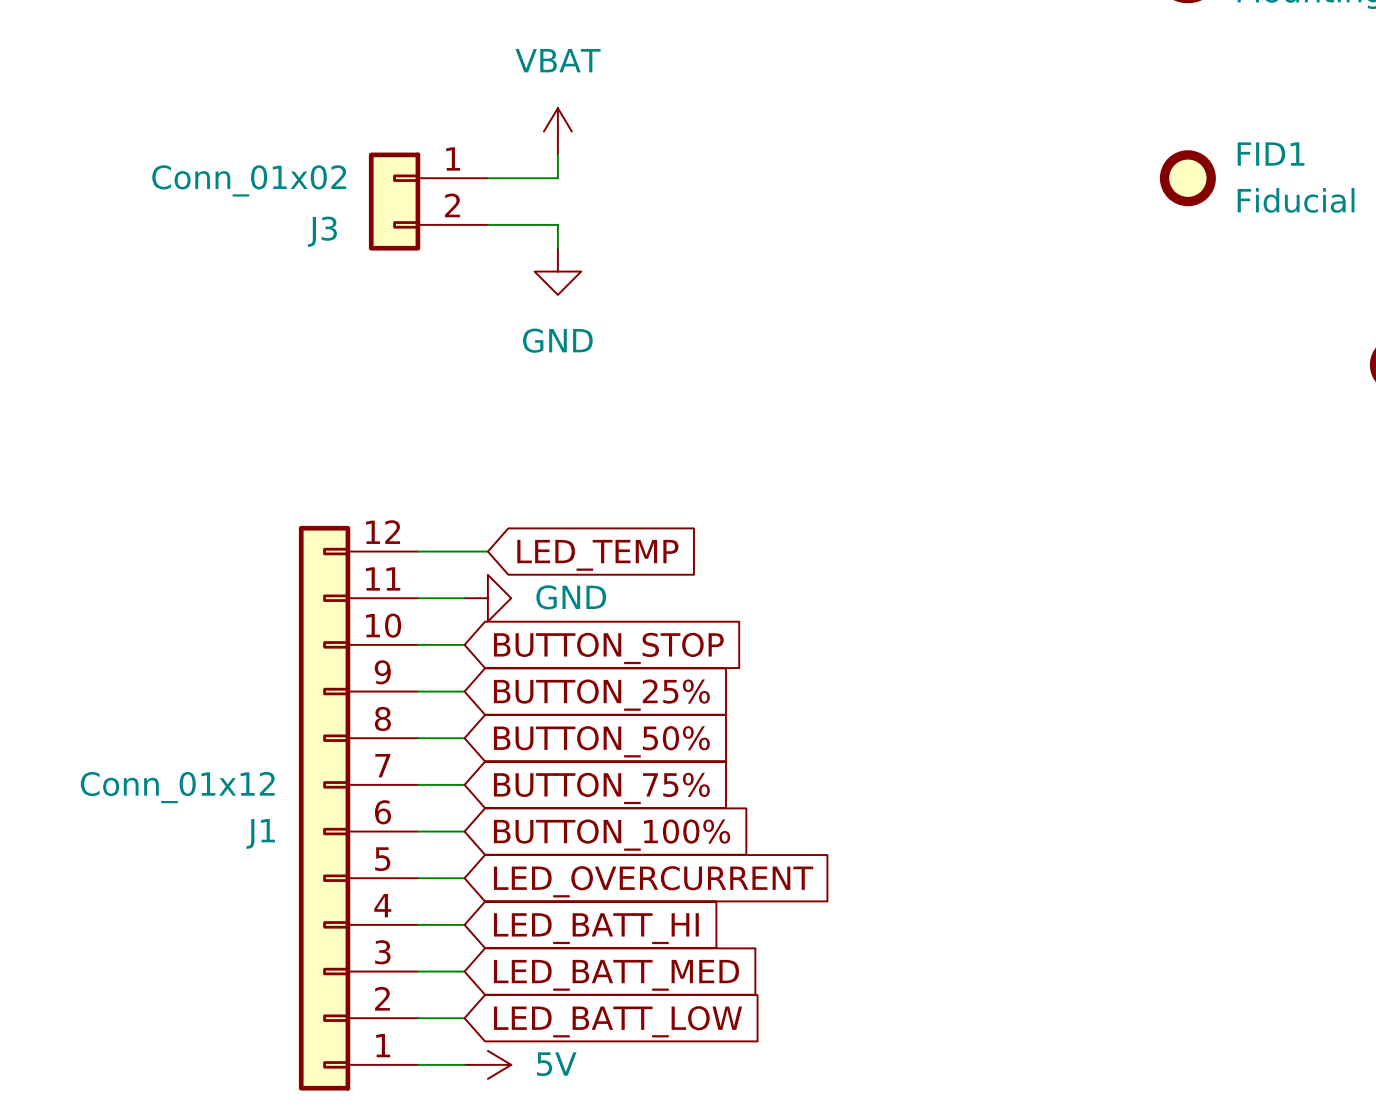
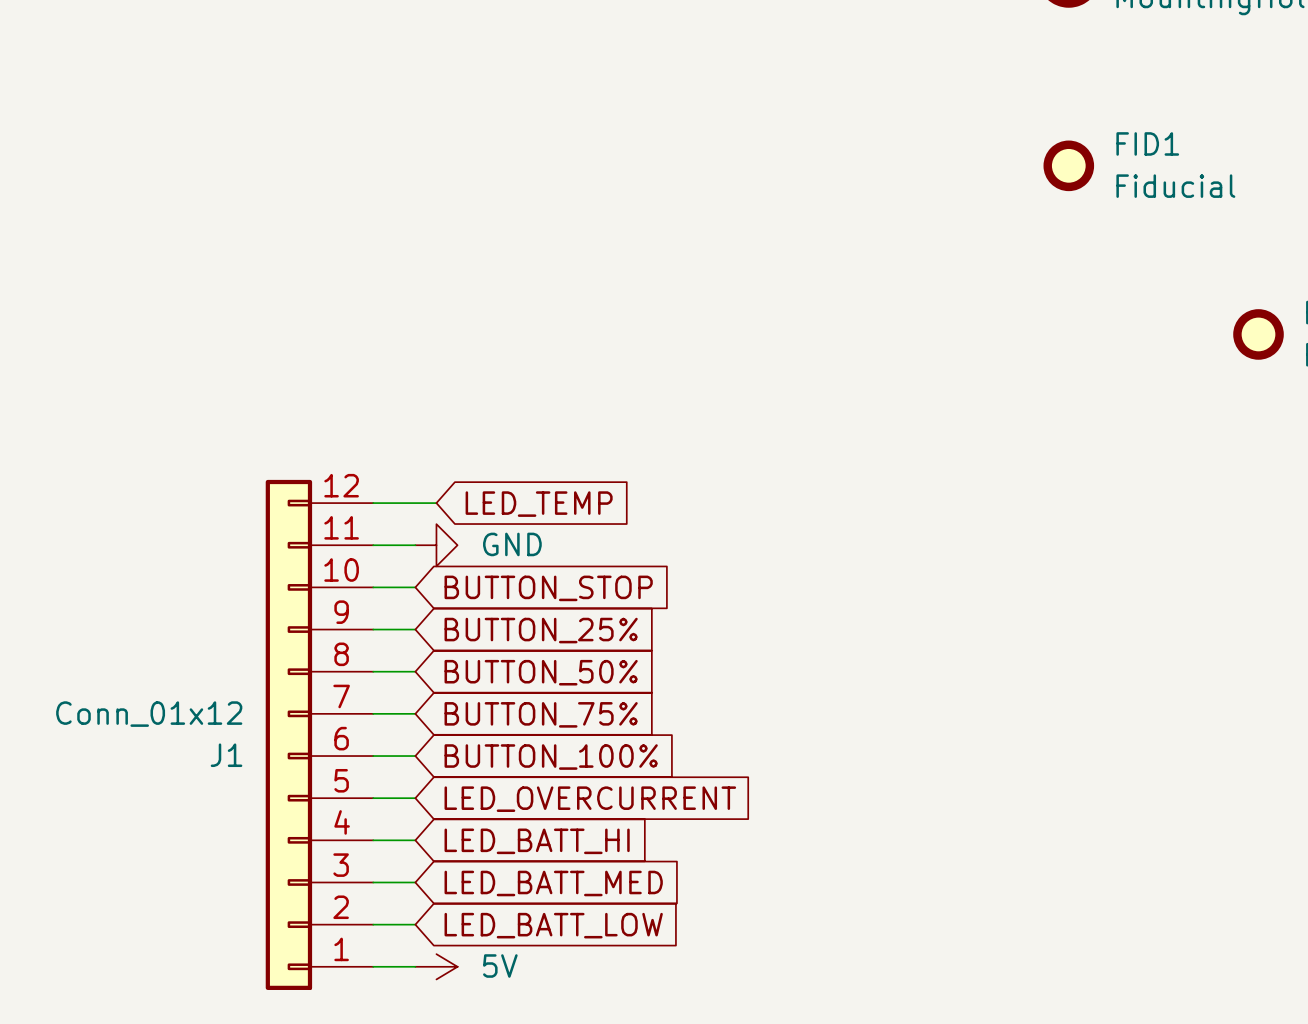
power symbol: VBAT (557, 131) -> none
wire: (557, 154) (557, 178) (487, 178) -> none
J3: Conn_01x02 (428, 201) -> none
wire: (487, 224) (557, 224) (557, 248) -> none
power symbol: GND (557, 271) -> none

